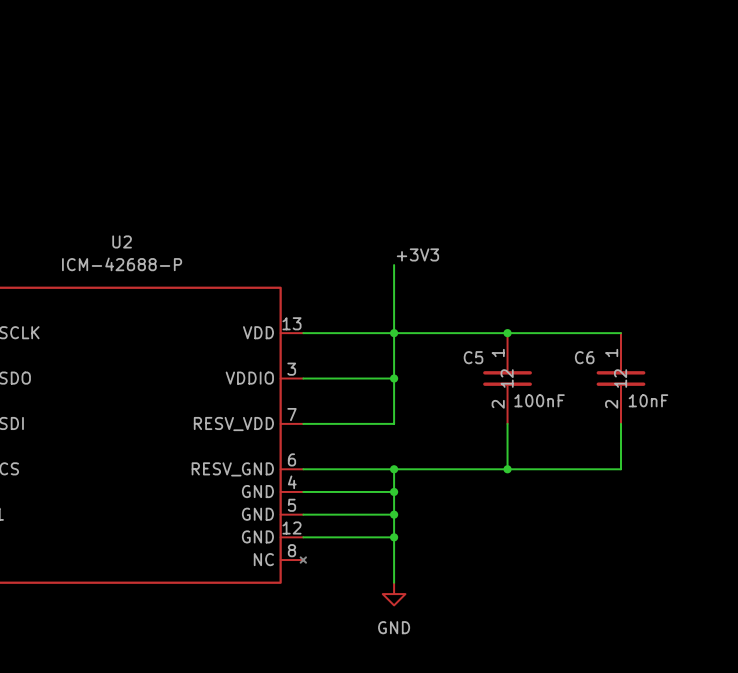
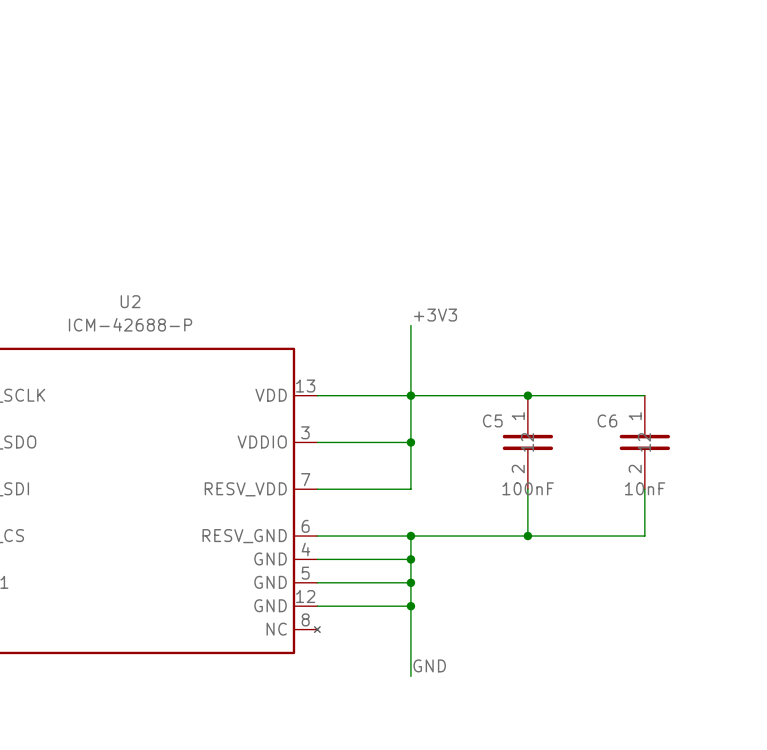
C5 value position: 100nF (539, 400) -> 100nF (528, 488)
C6 value position: 10nF (648, 400) -> 10nF (645, 488)
power symbol: GND (394, 594) -> none
label: none -> GND (429, 665)

